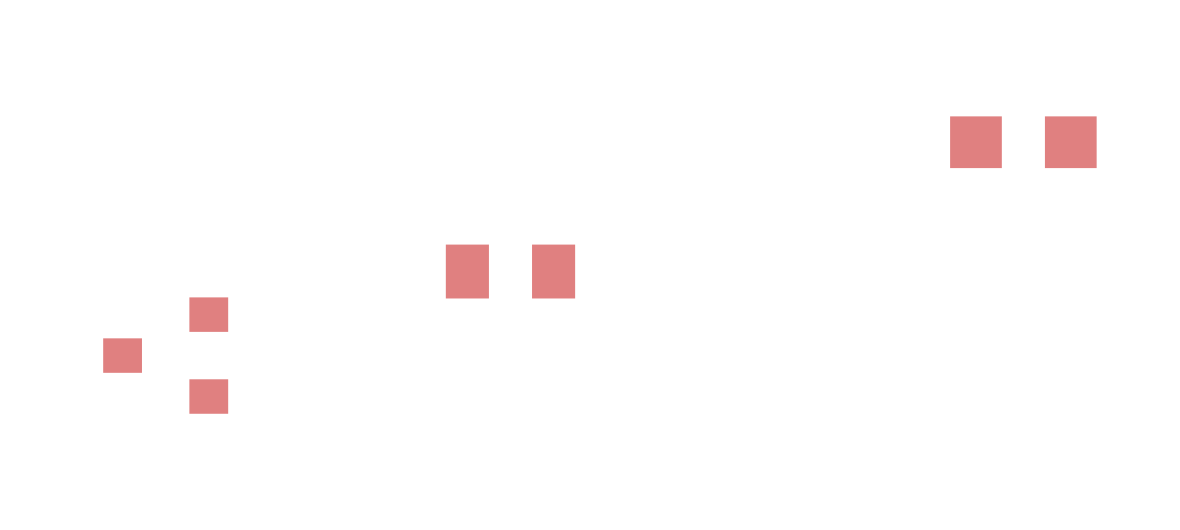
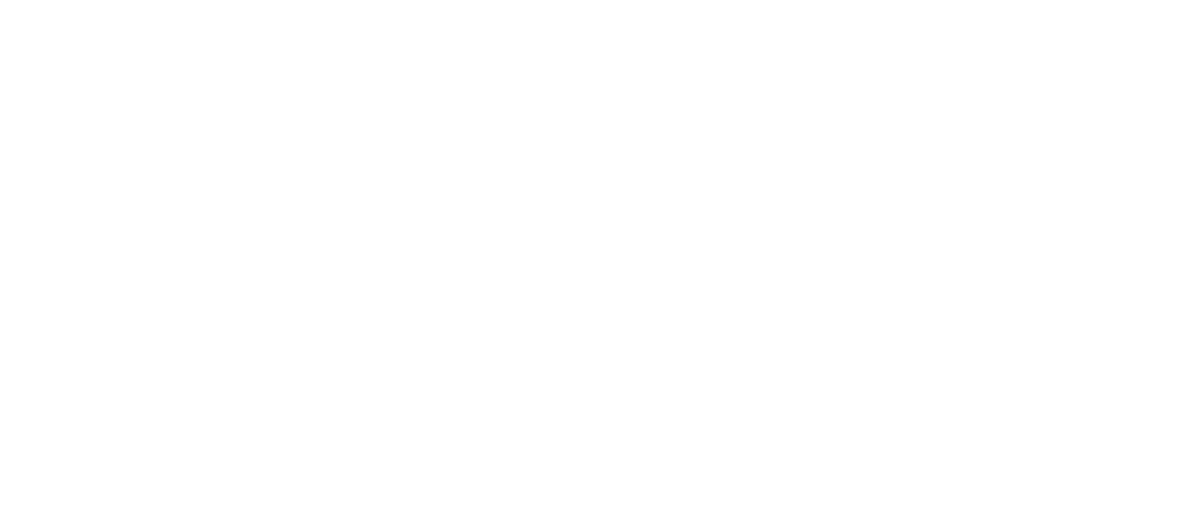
part: (1023, 142) -> none
part: (510, 271) -> none
part: (165, 355) -> none

